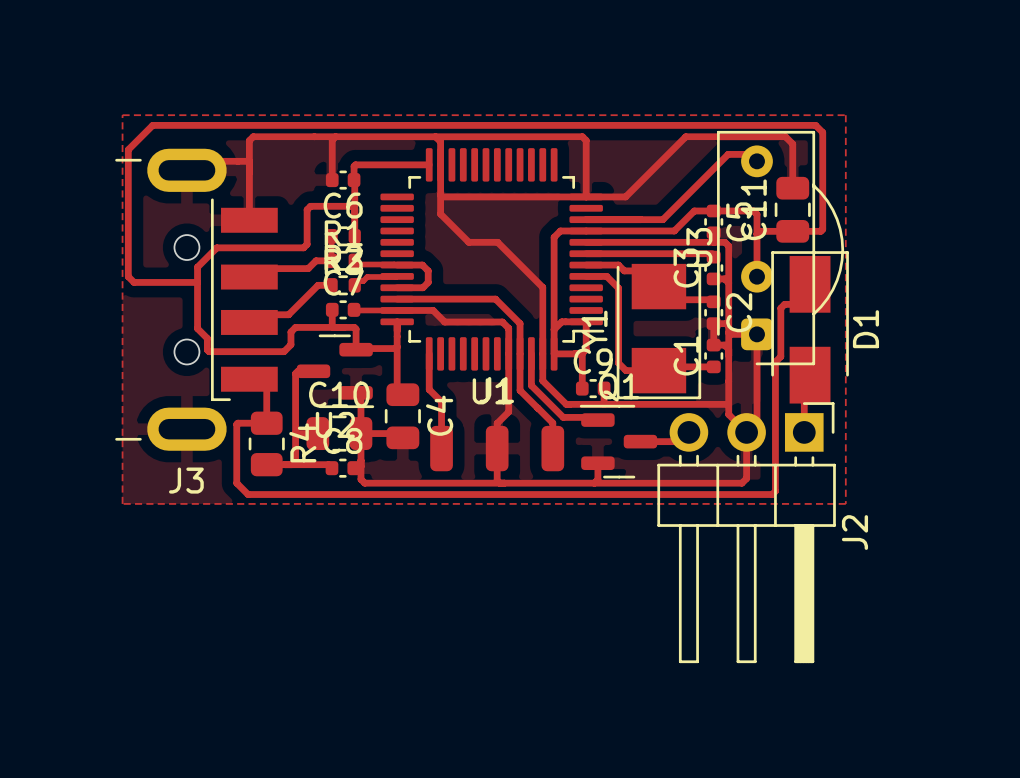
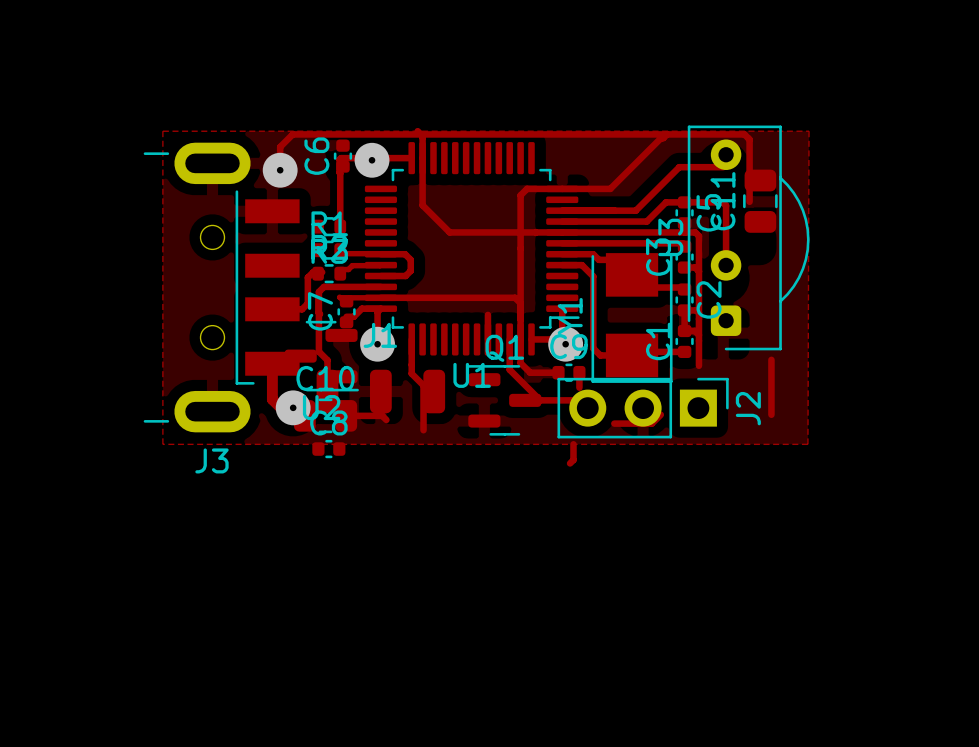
zone outline: (122, 115) (122, 503) (845, 503) (845, 115) (122, 115) -> (162, 131) (162, 444) (807, 444) (809, 131) (162, 131)
track: (335, 136) (332, 140) (332, 180) -> none
track: (756, 154) (728, 154) (708, 174) -> (723, 167) (679, 167)
track: (195, 161) (249, 161) -> none
via: none -> (372, 160)
track: none -> (280, 170) (280, 147) (292, 134) (744, 134) (749, 139) (749, 201)
via: none -> (280, 170)
C6 rotation: 0° (343, 180) -> 90° clockwise (342, 156)
C6 position: (343, 180) -> (342, 156)
track: (792, 188) (792, 144) (785, 136) (685, 136) (625, 196) -> (667, 134) (610, 188) (600, 188)
track: (440, 195) (442, 196) (549, 196) -> (520, 275) (520, 195) (527, 188)
track: (586, 196) (586, 140) (582, 136) (253, 136) (249, 140) (249, 220) -> none
track: (354, 208) (352, 206) (310, 206) (307, 209) (307, 244) (303, 247) (216, 247) (197, 267) (197, 328) (207, 338) (209, 351) (284, 351) (290, 344) (290, 332) (295, 327) (354, 327) (356, 329) (356, 349) -> none
track: (586, 231) (560, 231) (554, 237) (554, 353) -> none
track: (756, 234) (759, 231) (820, 231) (822, 229) (822, 132) (815, 125) (152, 125) (128, 149) (128, 276) (134, 282) (197, 282) -> none
track: (331, 236) (331, 260) (316, 260) (308, 268) (271, 268) (262, 277) (249, 277) -> none
track: (497, 242) (542, 287) -> (477, 232) (562, 232)
track: none -> (322, 272) (313, 272) (307, 277) (307, 303) (302, 309) (272, 309)
track: (810, 284) (810, 293) (799, 304) (784, 304) (780, 308) (780, 356) (775, 362) (775, 491) (772, 494) (248, 494) (236, 483) (236, 424) (266, 423) (266, 386) (259, 379) (249, 379) (249, 386) -> none
track: (331, 285) (318, 285) (288, 314) (255, 314) (249, 322) -> none
J3 position: (196, 299) -> (221, 287)
track: (397, 299) (495, 299) (520, 323) (520, 390) (552, 423) (552, 448) -> (380, 286) (323, 286) (318, 291) (318, 351) (327, 360) (327, 391)
C7 rotation: 0° (343, 309) -> 90° clockwise (346, 311)
C7 position: (343, 309) -> (346, 311)
track: (433, 310) (444, 322) (502, 322) (508, 328) -> (415, 297) (515, 297) (520, 303)
track: (397, 321) (397, 388) (402, 394) -> none
track: (586, 321) (561, 321) (554, 329) -> none
D1: (810, 327) -> none
track: none -> (346, 316) (353, 316) (361, 308) (380, 308) (377, 312) (377, 344)
track: (728, 332) (730, 334) (756, 334) (756, 422) (746, 432) -> none
track: (397, 346) (371, 348) -> none
track: (508, 353) (508, 411) (497, 423) (497, 480) (499, 483) -> none
track: (582, 353) (582, 388) -> (520, 363) (530, 372) (558, 372)
via: none -> (377, 344)
via: none -> (565, 344)
track: (313, 371) (297, 371) (295, 373) (295, 461) (292, 464) -> none
track: (542, 378) (542, 380) (566, 404) (728, 405) -> none
track: (728, 381) (728, 414) (746, 432) -> none
track: none -> (272, 366) (272, 399) (280, 407) (293, 407)
track: (356, 392) (360, 397) (360, 479) (364, 483) (741, 483) (746, 478) (746, 432) -> none
J2 footprint: [657, 402, 836, 664] -> [557, 377, 729, 439]
C4: (402, 416) -> none
via: none -> (293, 407)
Q1 position: (618, 441) -> (504, 400)
R4: (266, 443) -> none
J1 position: (497, 448) -> (380, 391)
track: (266, 464) (328, 464) (331, 468) -> none

